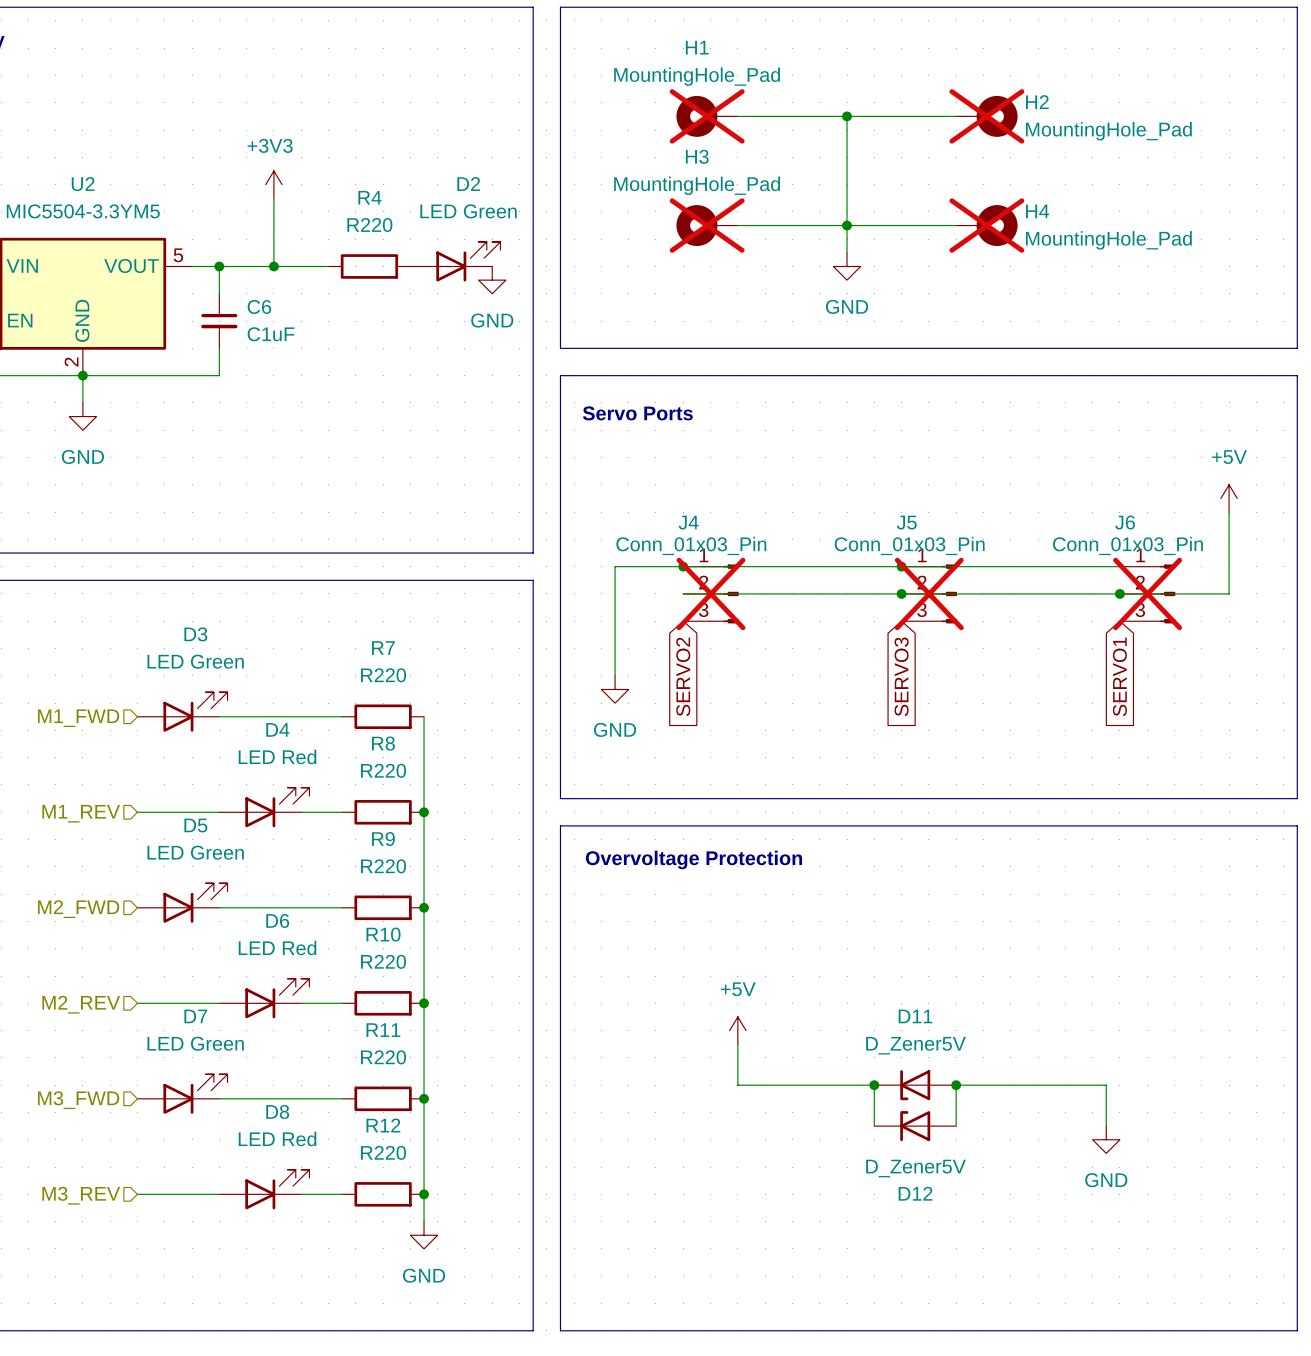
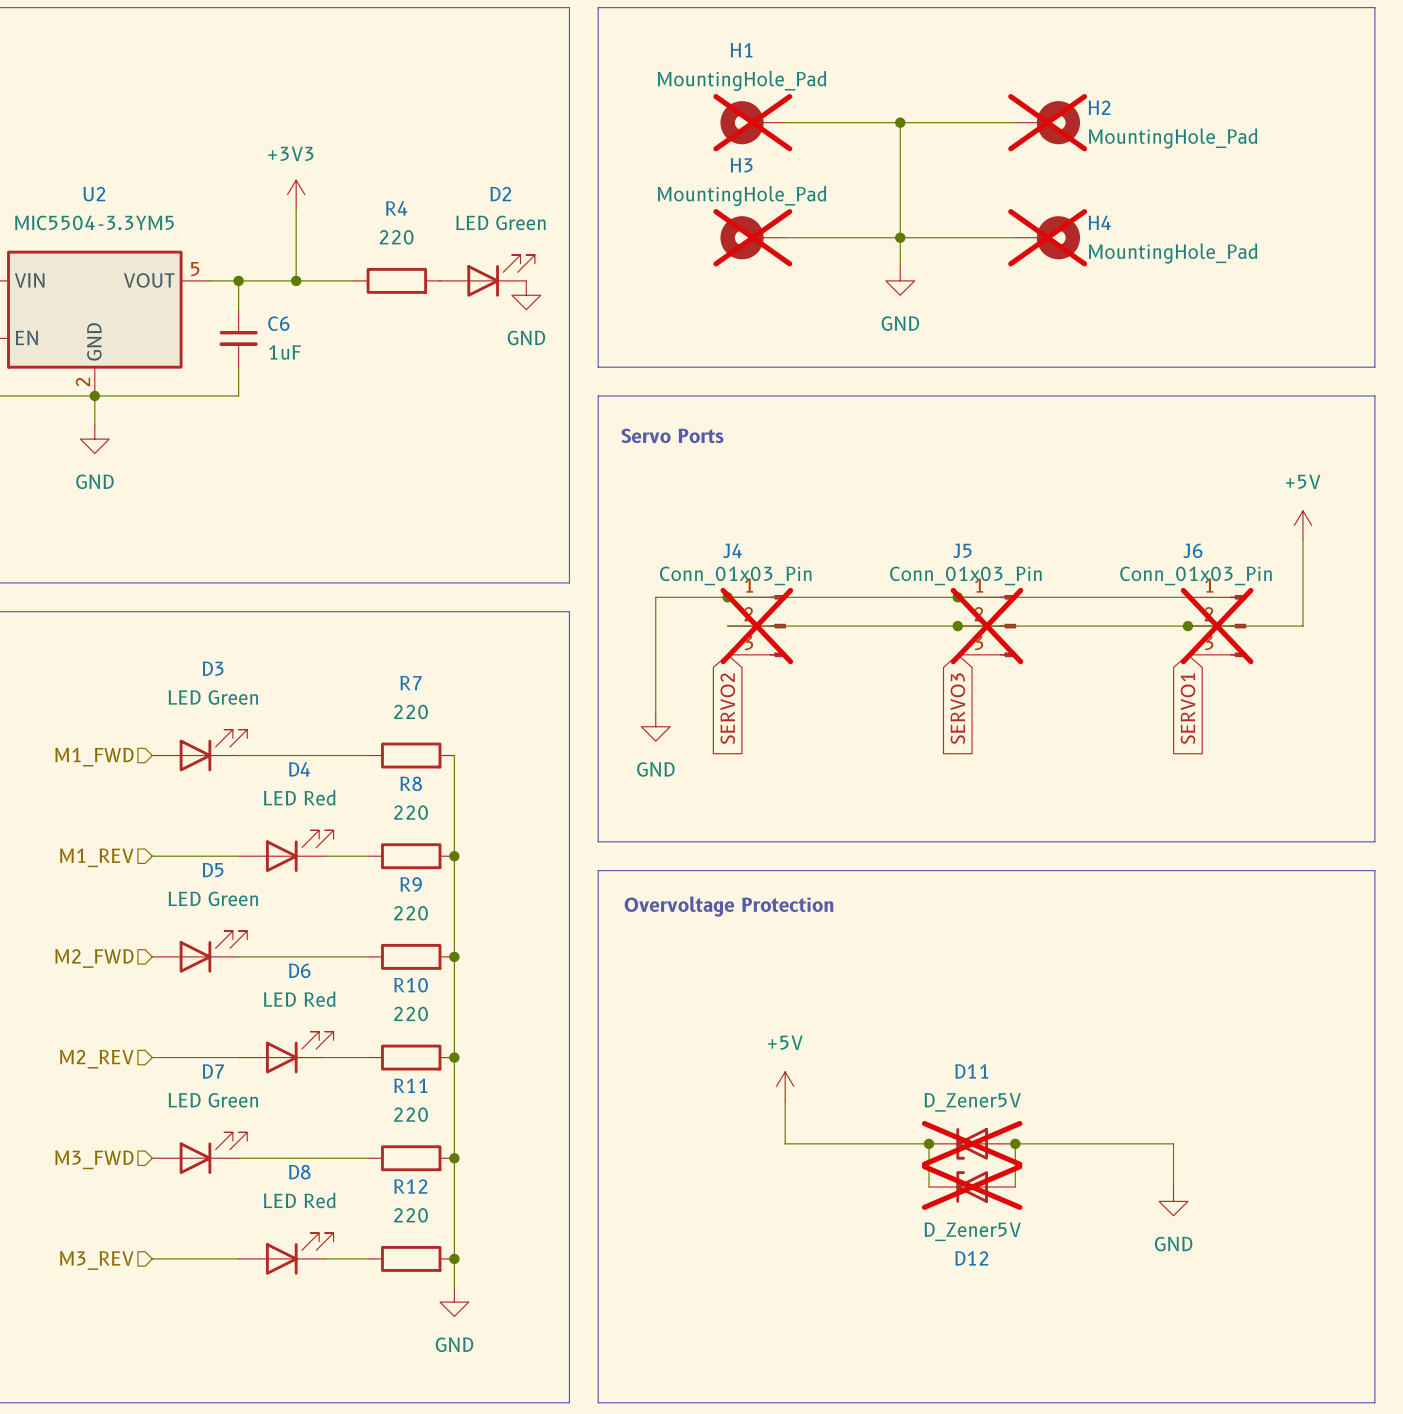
R4 value: R220 (369, 225) -> 220 (396, 237)
C6 value: C1uF (270, 334) -> 1uF (285, 352)
R7 value: R220 (383, 675) -> 220 (411, 711)
R8 value: R220 (383, 770) -> 220 (411, 812)
R9 value: R220 (383, 866) -> 220 (411, 913)
R10 value: R220 (383, 961) -> 220 (411, 1013)
R11 value: R220 (383, 1057) -> 220 (411, 1114)
D11 do-not-place cross: none -> (972, 1143)
D12 do-not-place cross: none -> (972, 1187)
R12 value: R220 (383, 1152) -> 220 (411, 1215)

